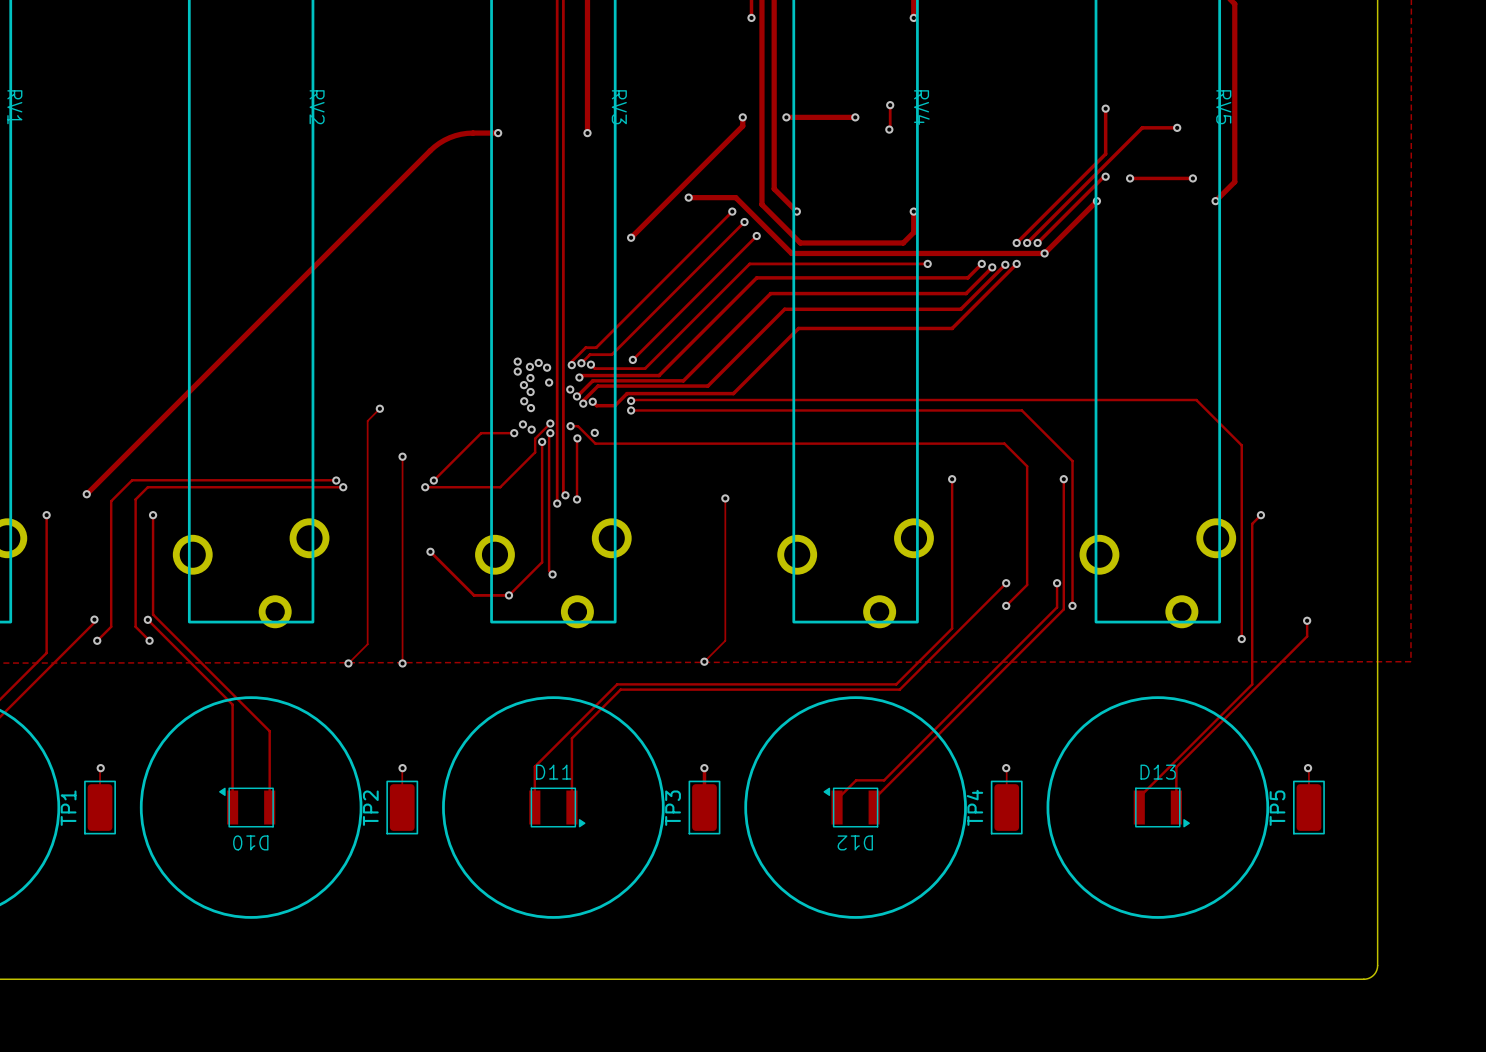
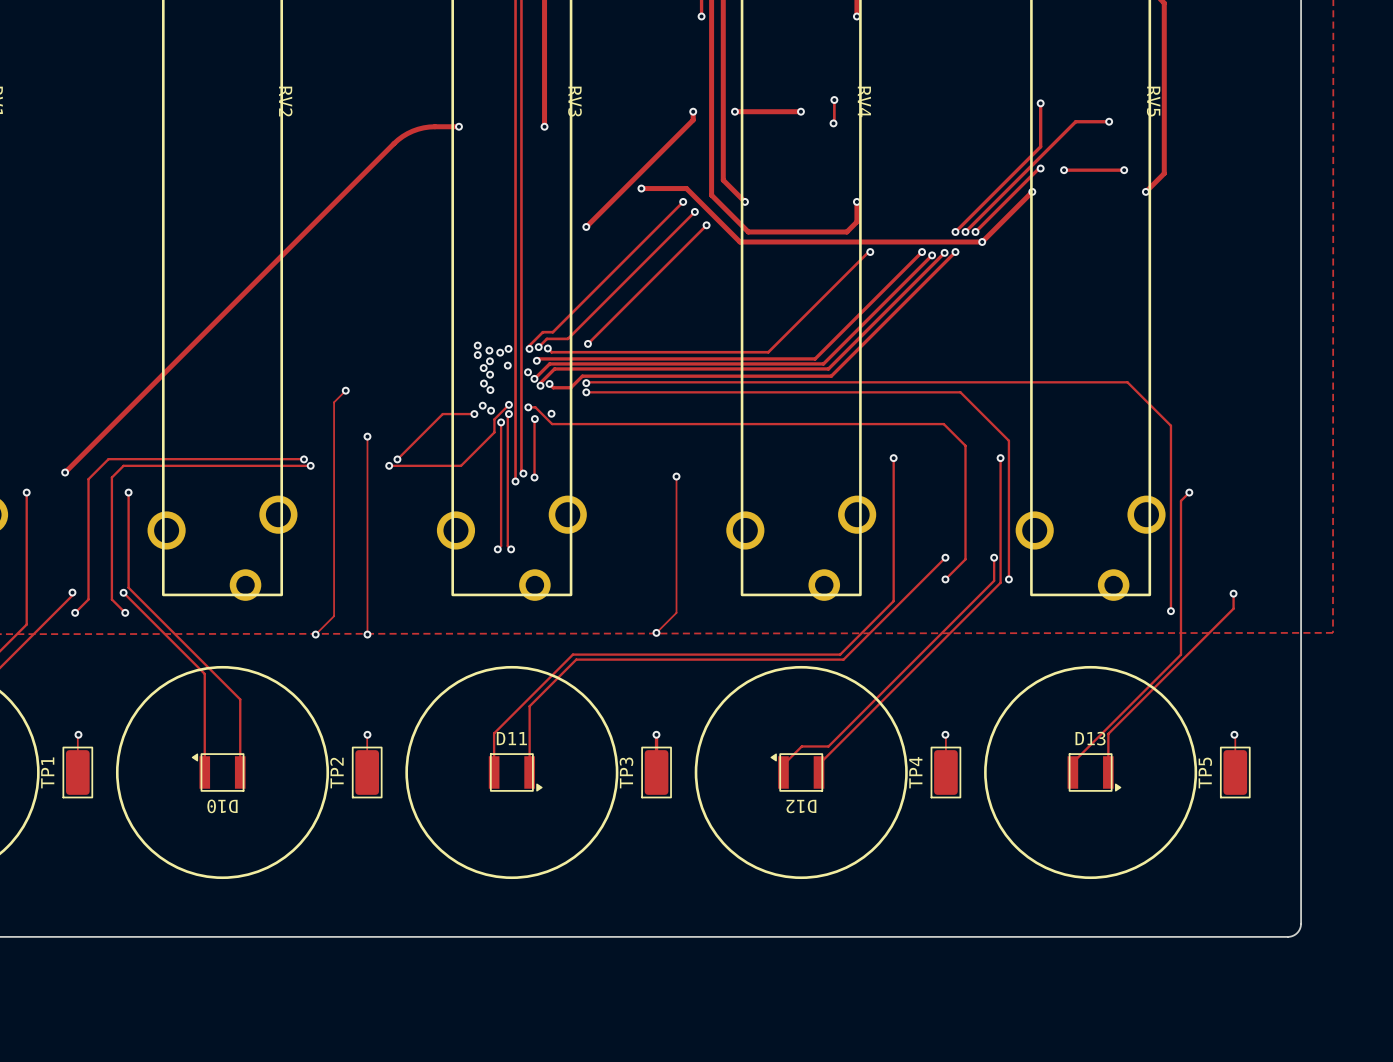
track: (925, 263) (749, 263) (645, 368) -> (868, 252) (768, 352) (599, 352)
track: (967, 277) (756, 277) (659, 375) -> (908, 265) (815, 358) (613, 358)
track: (966, 293) (770, 293) (683, 380) -> (907, 280) (823, 363) (636, 363)
track: (960, 309) (784, 309) (707, 386) -> (902, 295) (828, 368) (659, 368)
track: (952, 328) (798, 328) (733, 393) -> (893, 313) (831, 376) (684, 376)
via: (538, 362) -> none
via: none -> (508, 348)
via: (547, 367) -> none
via: none -> (500, 352)
track: (430, 551) (474, 595) (508, 595) (542, 562) -> (497, 549) (501, 546) (501, 537)
via: (430, 551) -> none
via position: (508, 595) -> (497, 549)

